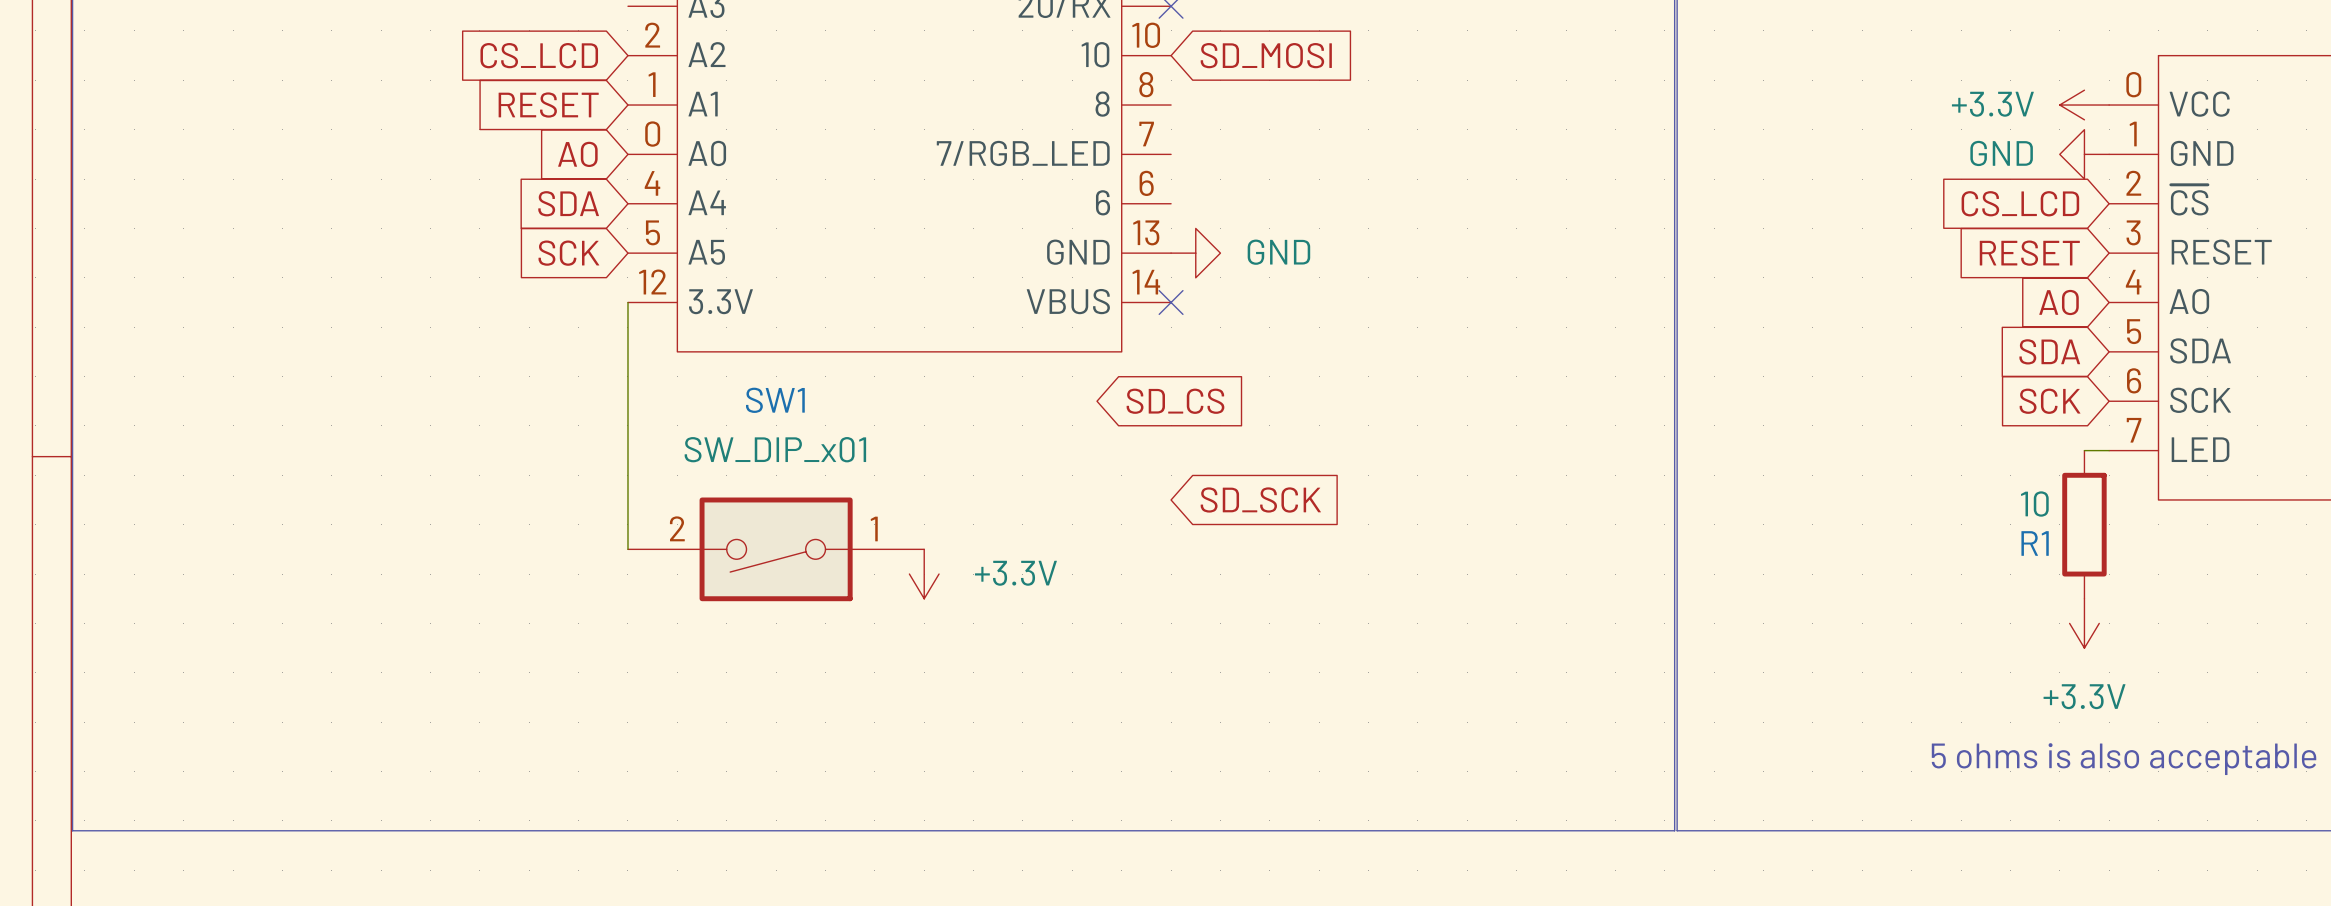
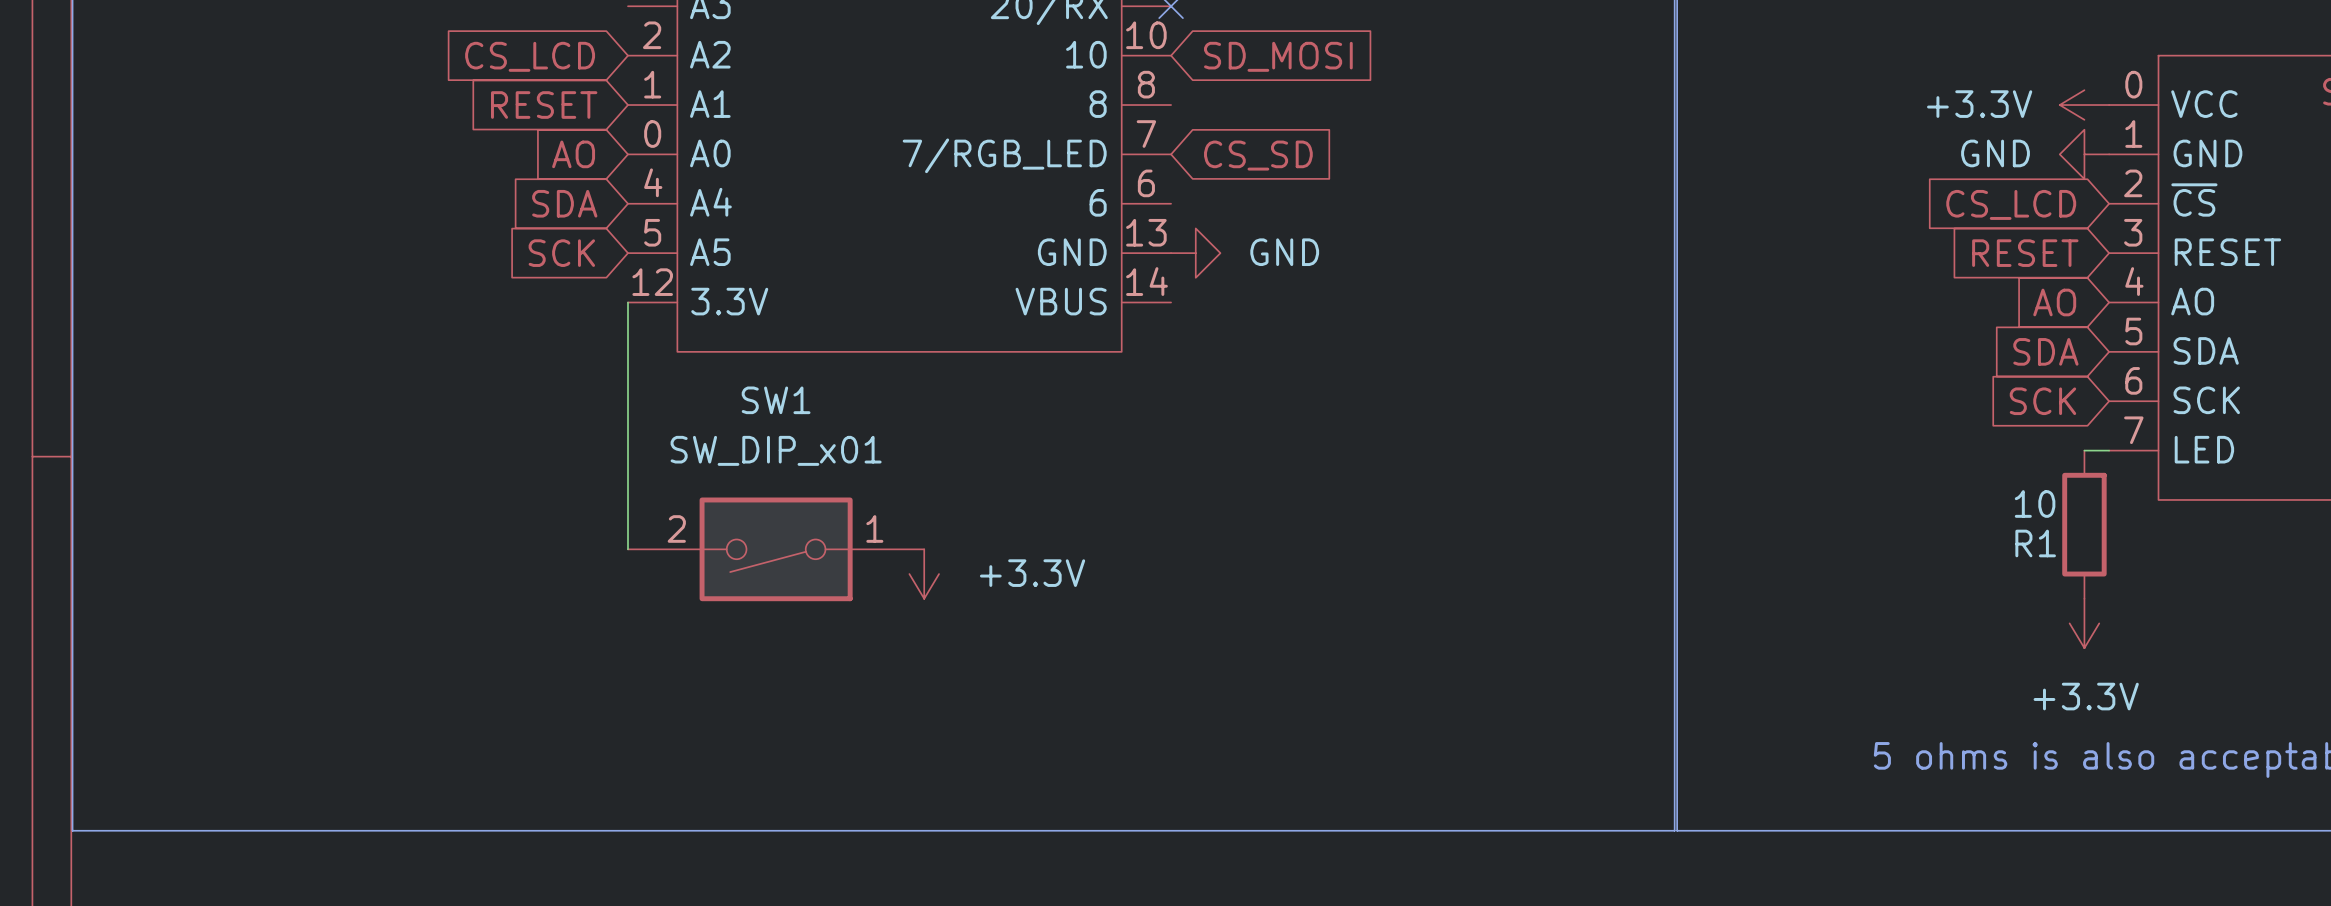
global label: none -> CS_SD (1258, 155)
no-connect mark: (1171, 302) -> none
global label: SD_CS (1175, 401) -> none
global label: SD_SCK (1260, 500) -> none

